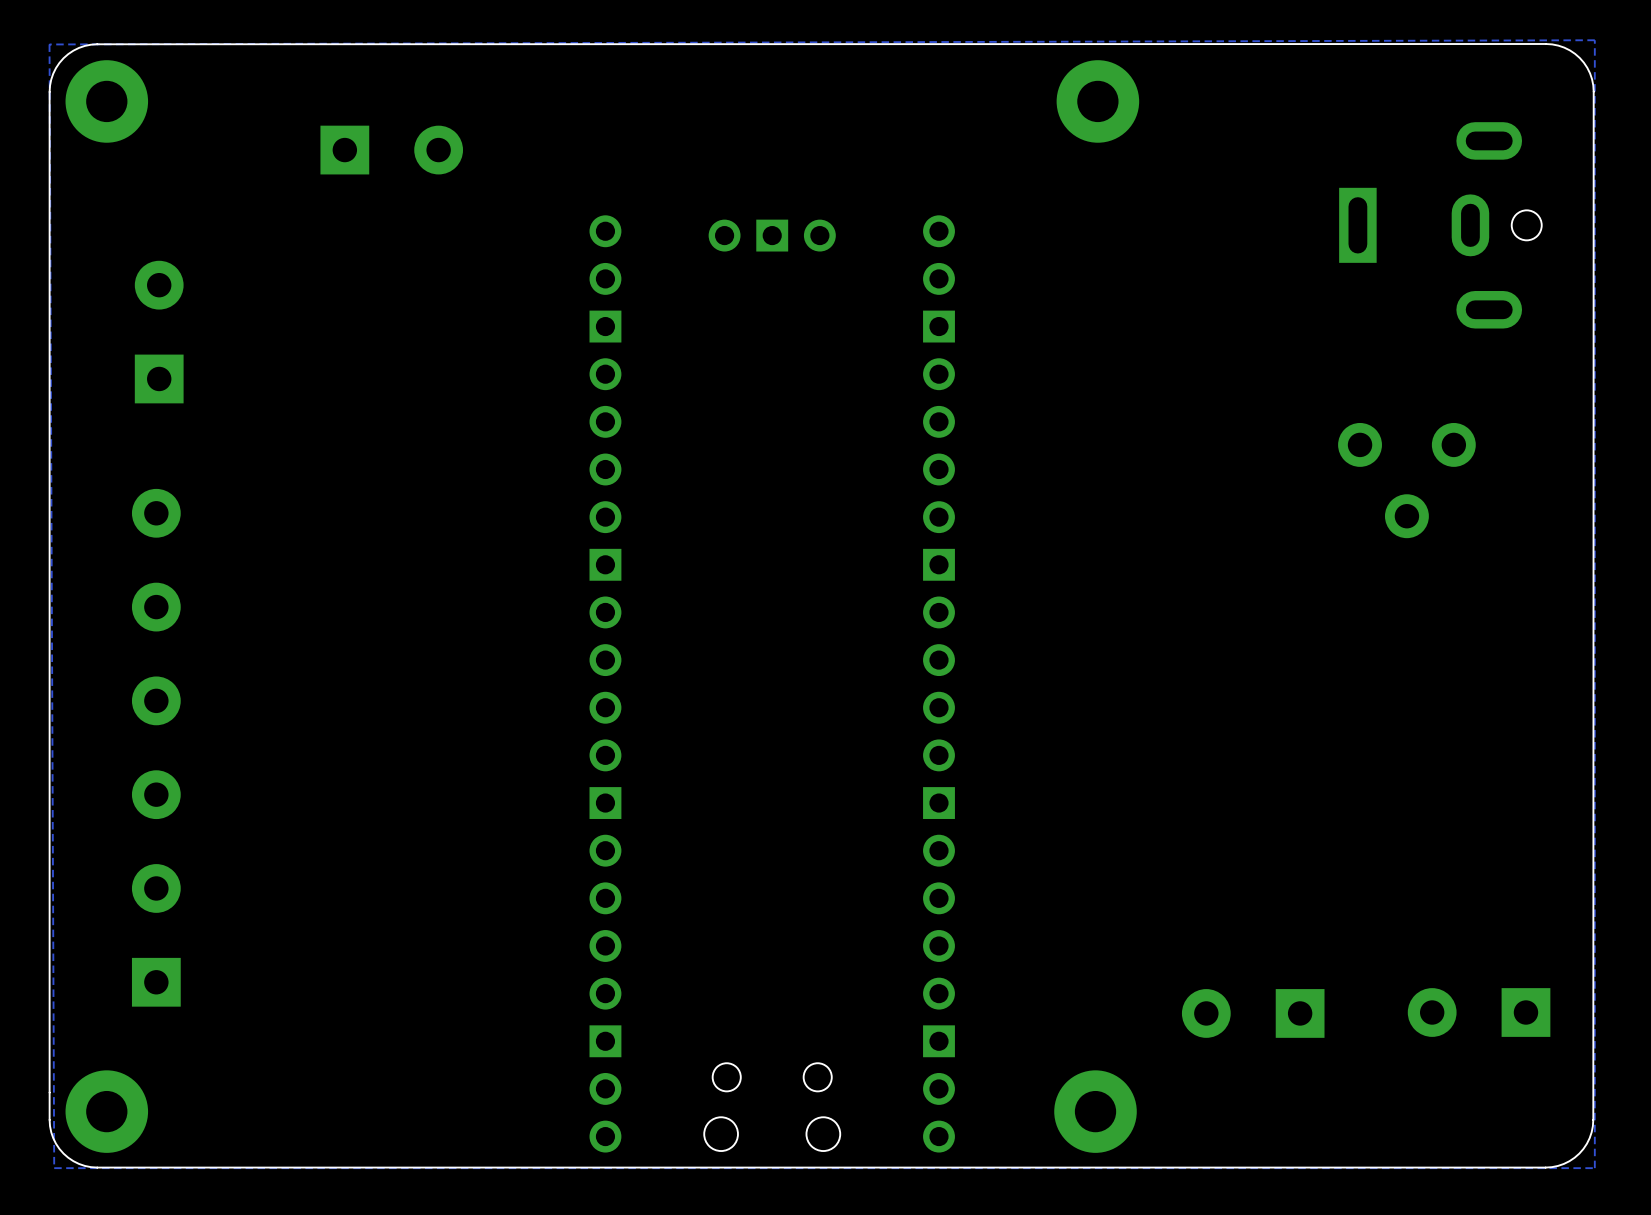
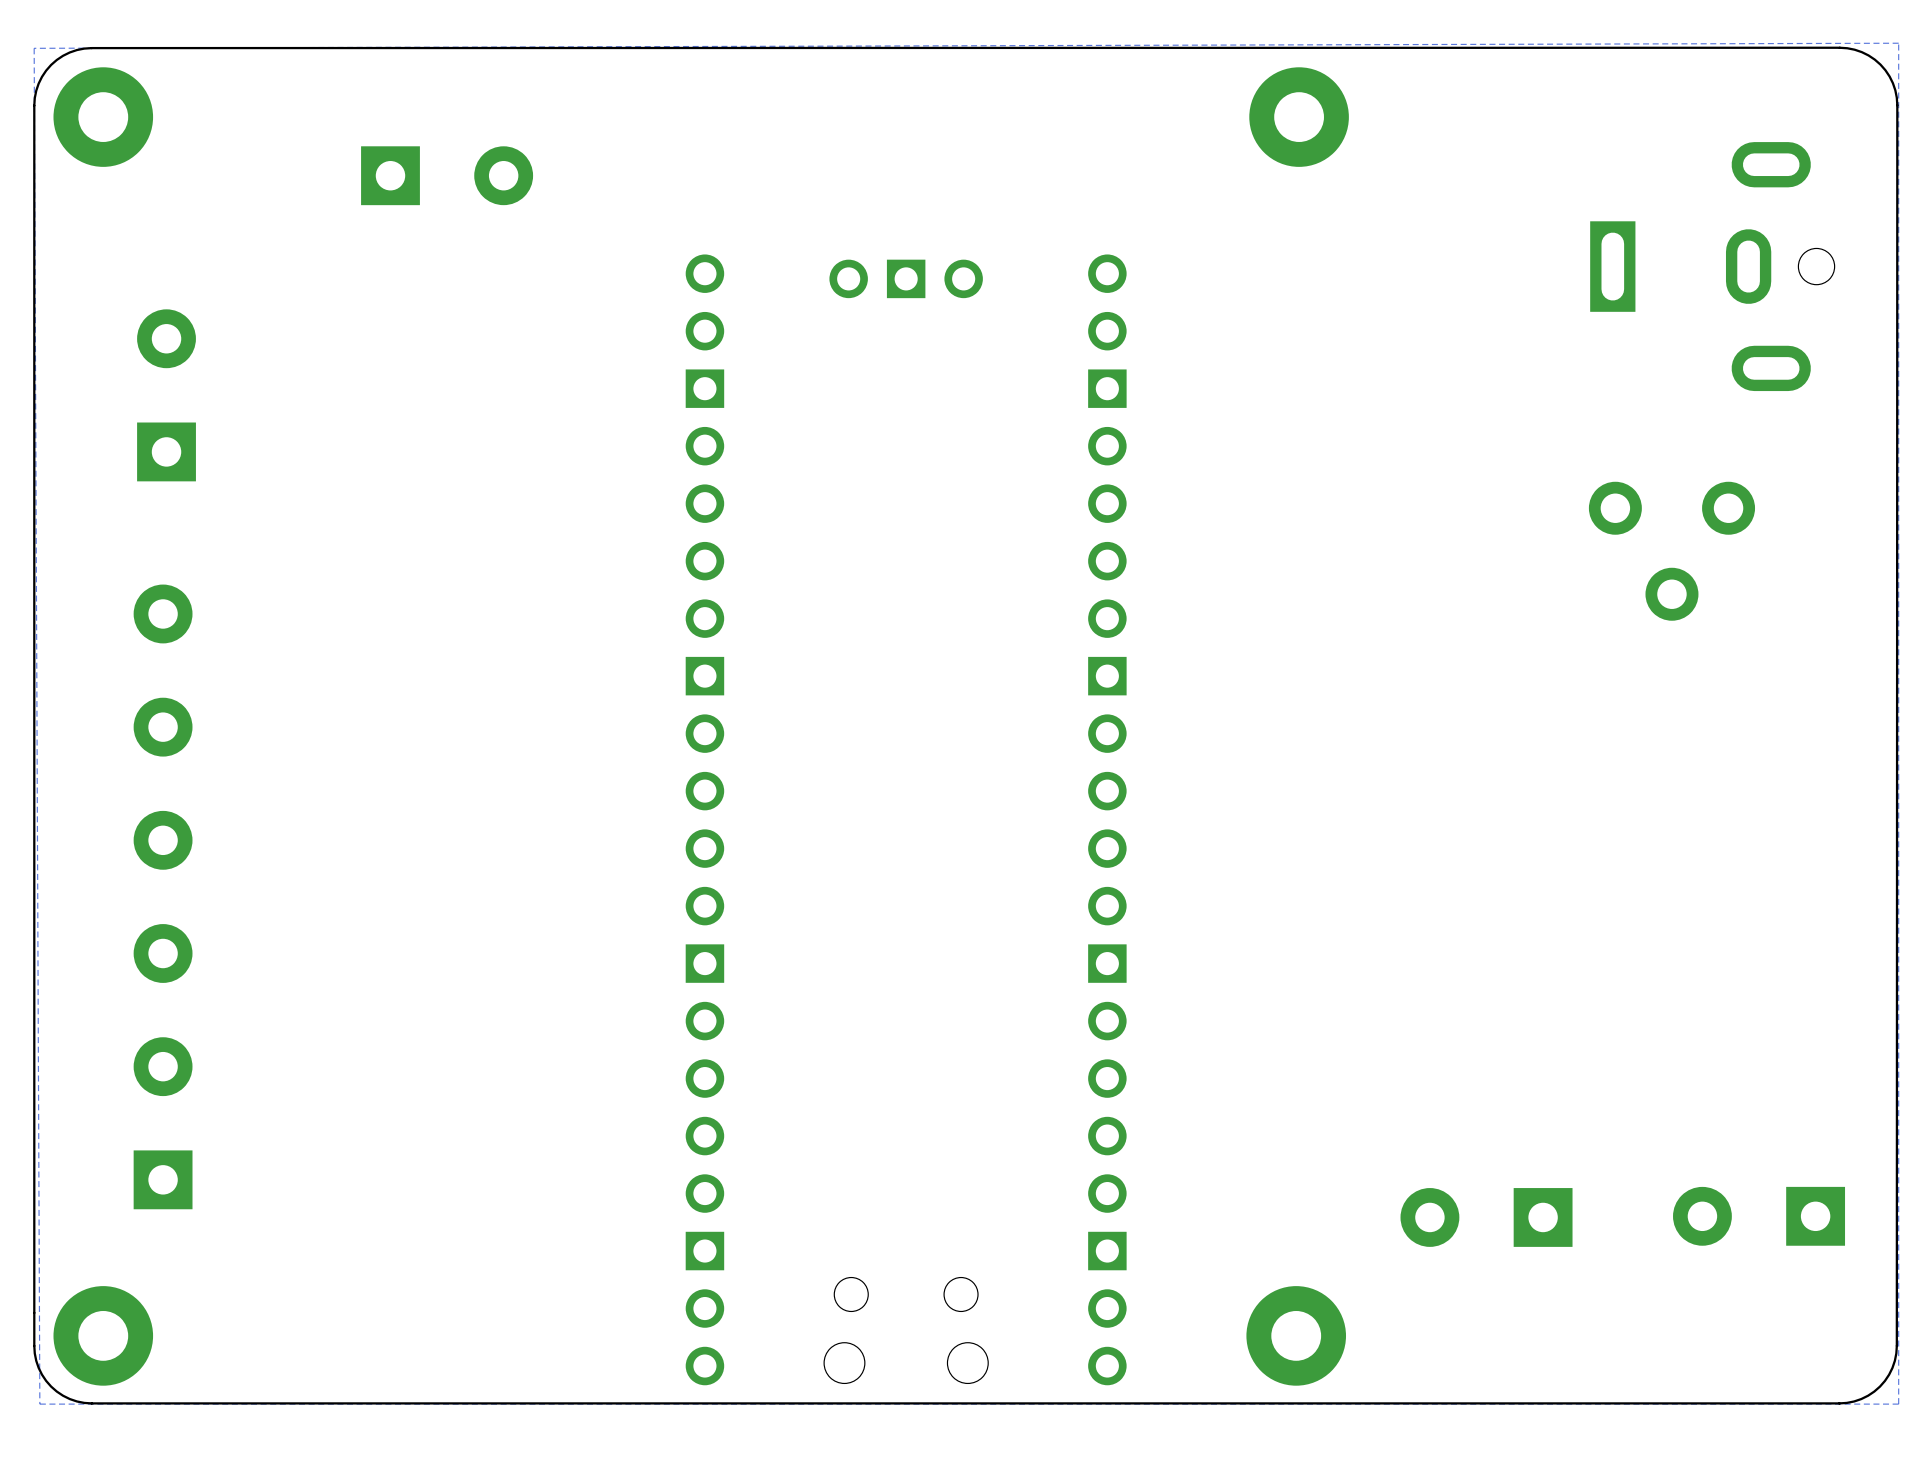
part position: (1406, 480) -> (1671, 551)

